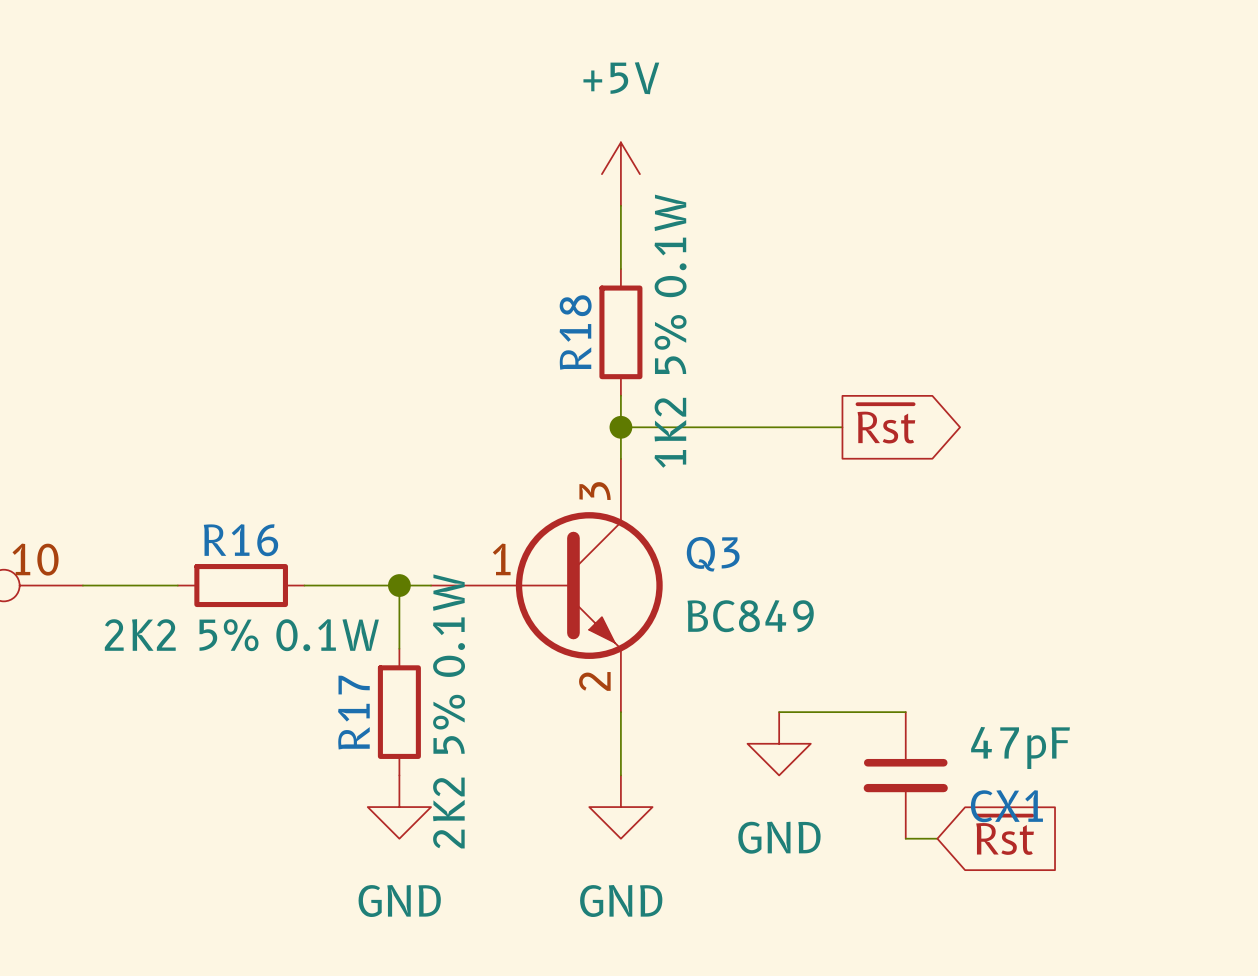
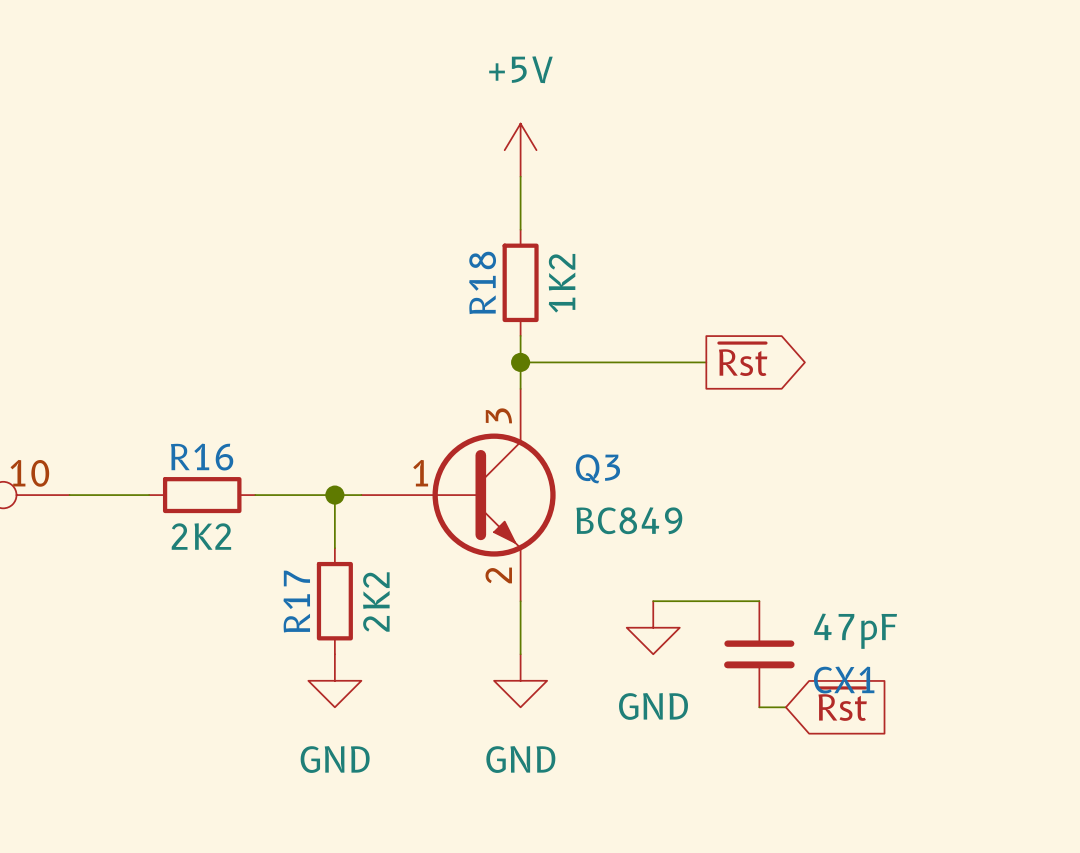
R18 value: 1K2 5% 0.1W (670, 331) -> 1K2 (562, 283)
R16 value: 2K2 5% 0.1W (241, 635) -> 2K2 (201, 536)
R17 value: 2K2 5% 0.1W (449, 711) -> 2K2 (376, 602)

